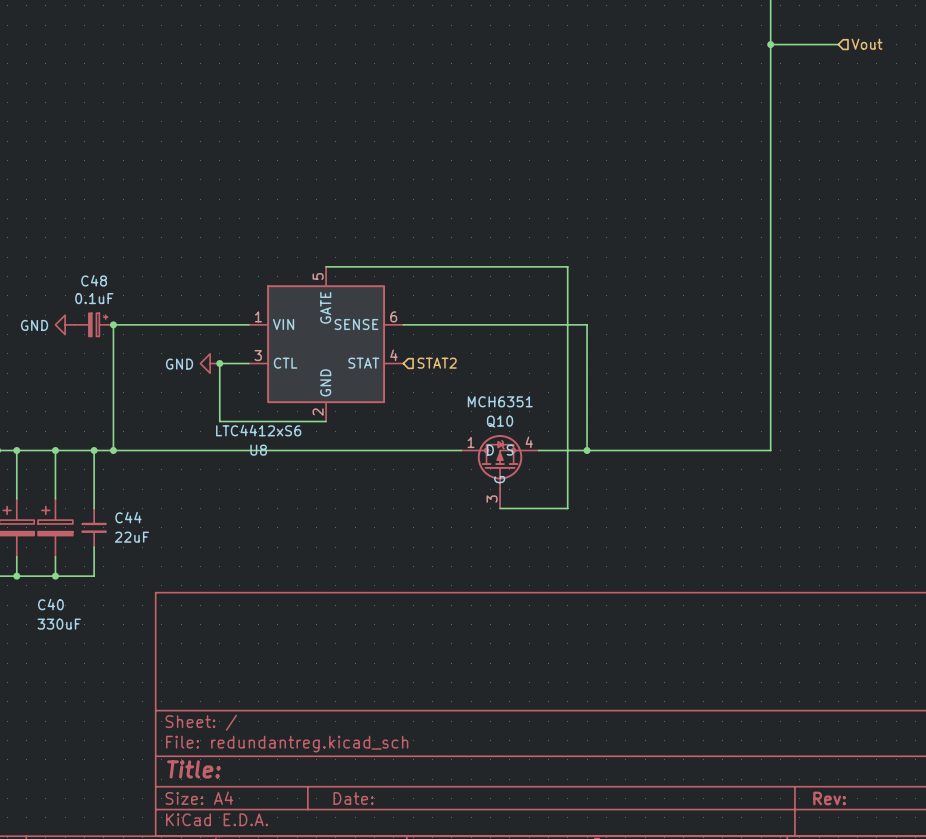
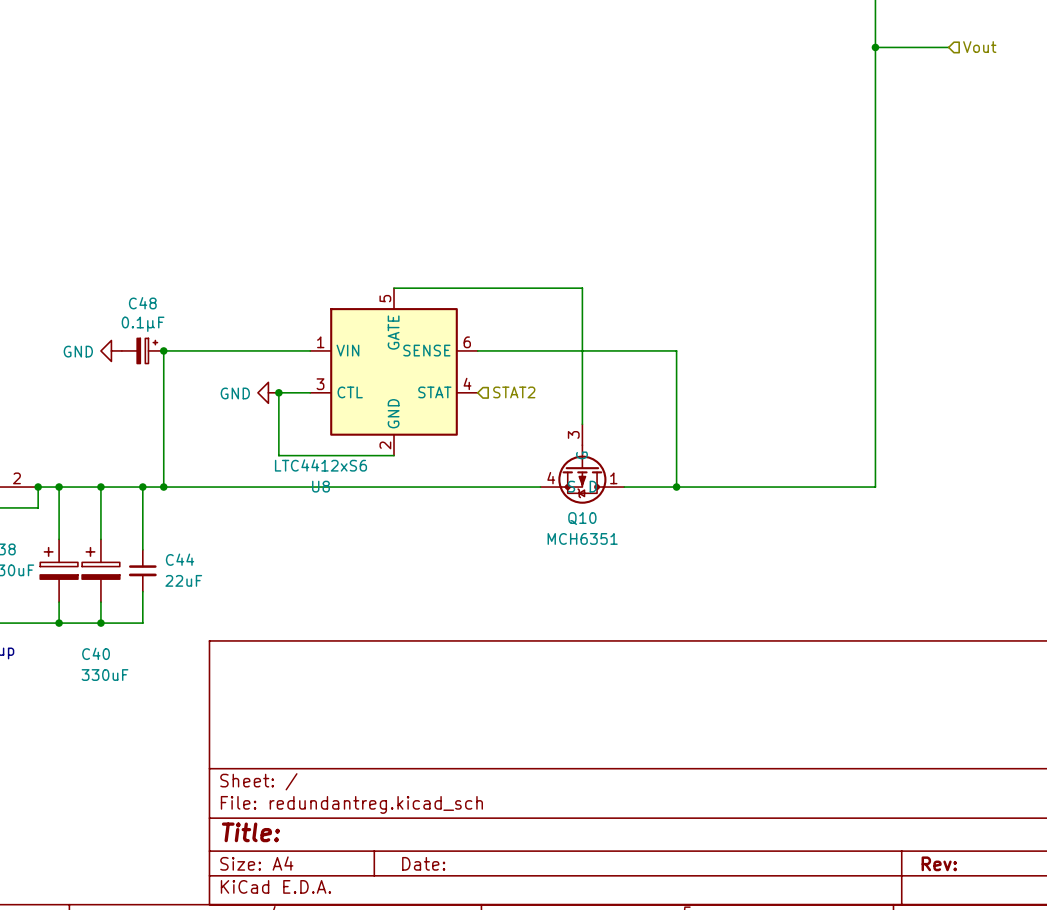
wire: (500, 266) (567, 266) (567, 508) (500, 508) -> (582, 288) (582, 424)
C48 value: 0.1uF (94, 298) -> 0.1µF (143, 324)
Q10 rotation: 0° (500, 462) -> 180° (582, 474)

